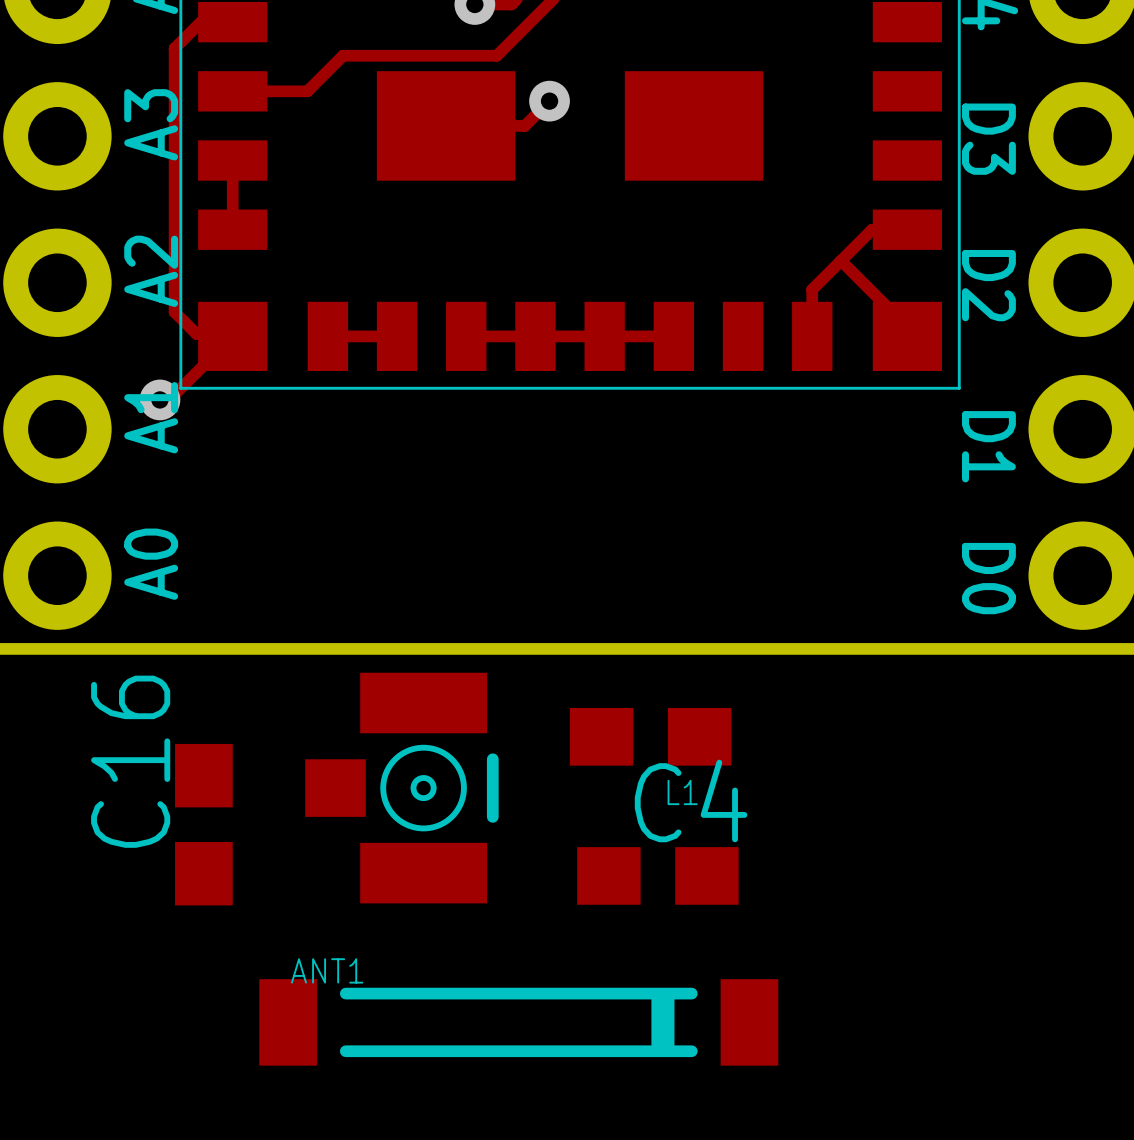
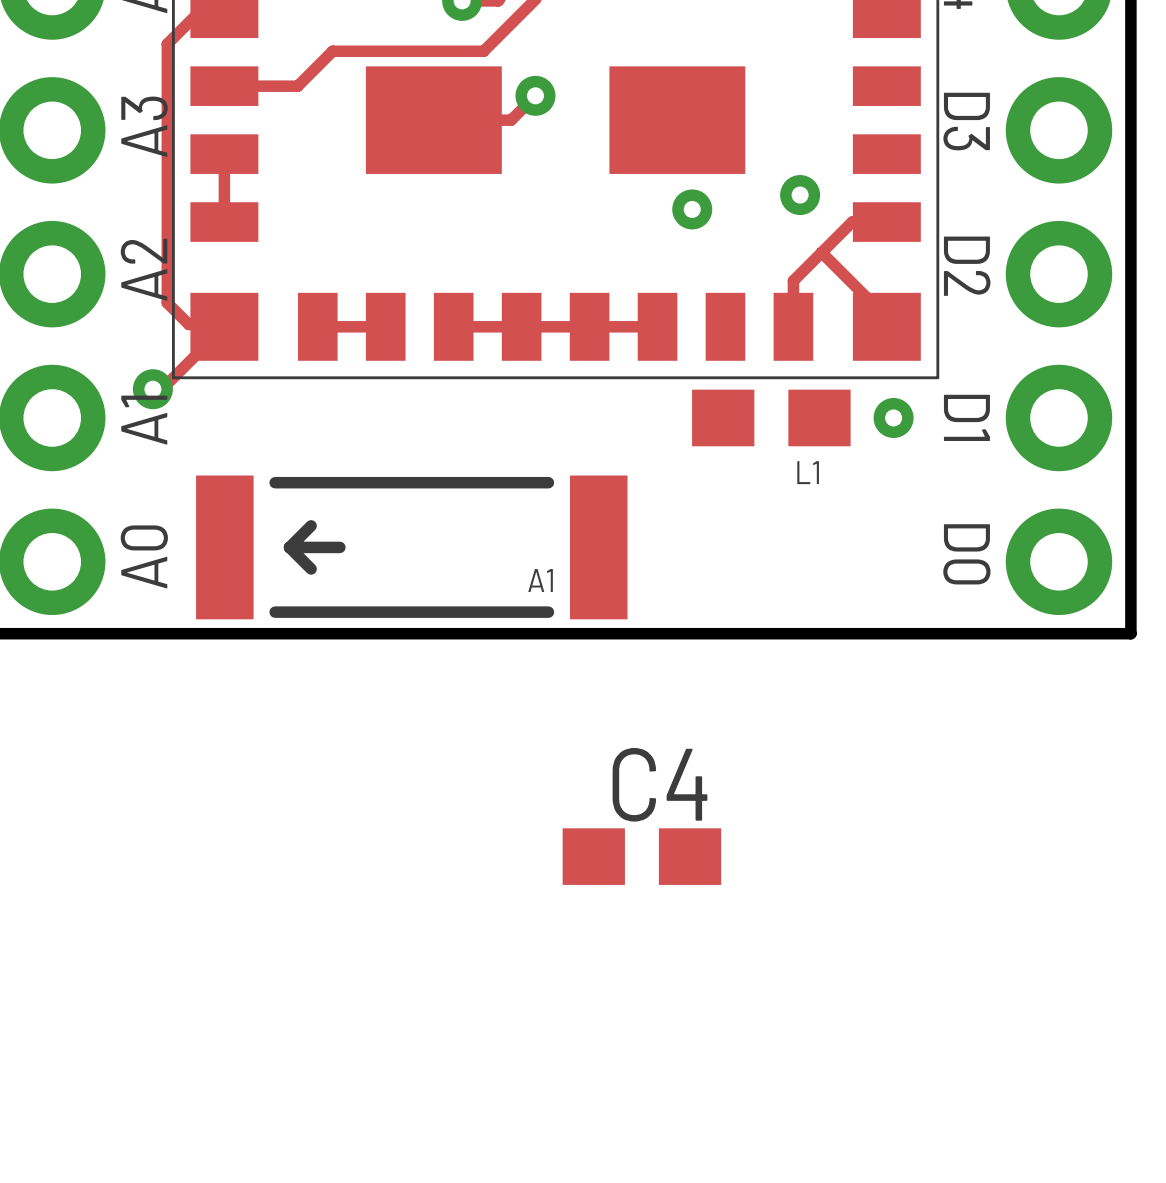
via: none -> (800, 195)
via: none -> (692, 209)
via: none -> (893, 417)
A1: none -> (411, 547)
L1 position: (650, 736) -> (771, 417)
part: (401, 788) -> none
C16: (203, 824) -> none
ANT1: (518, 1022) -> none

